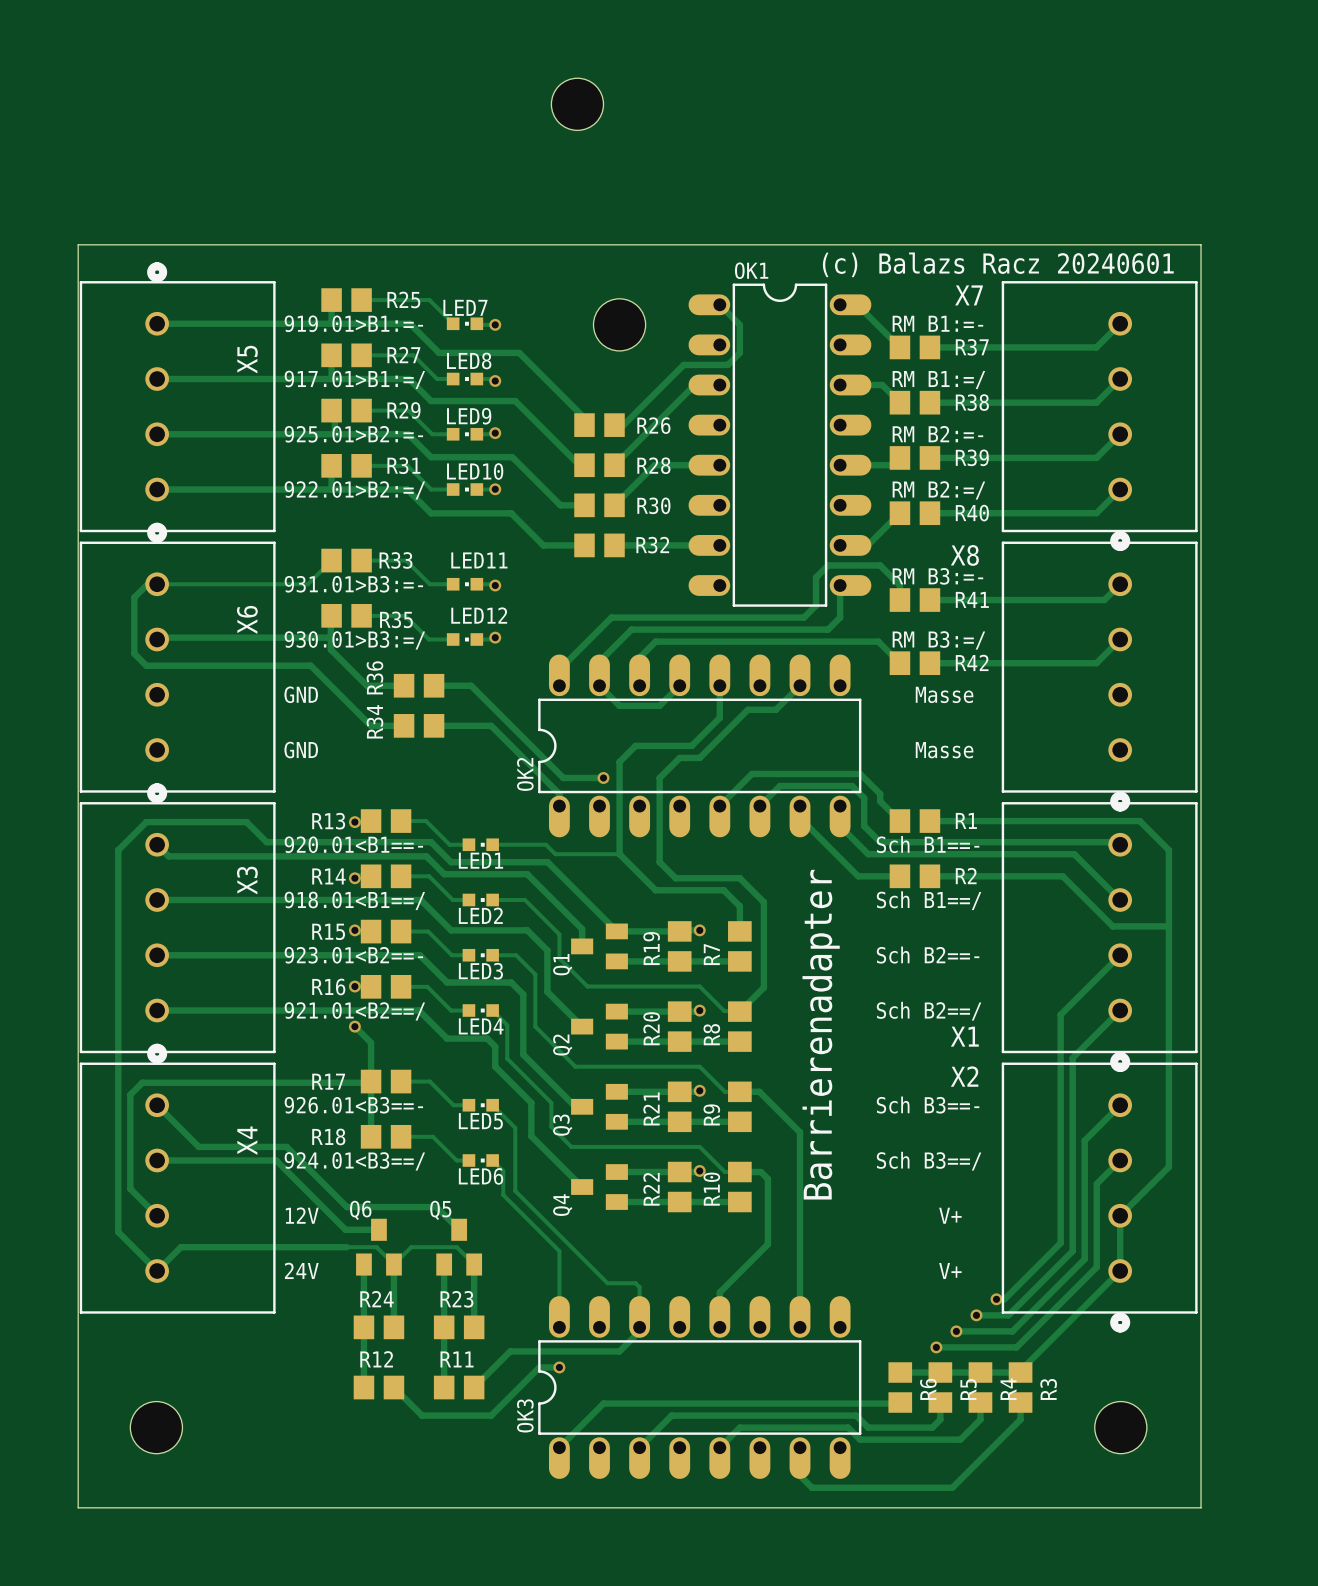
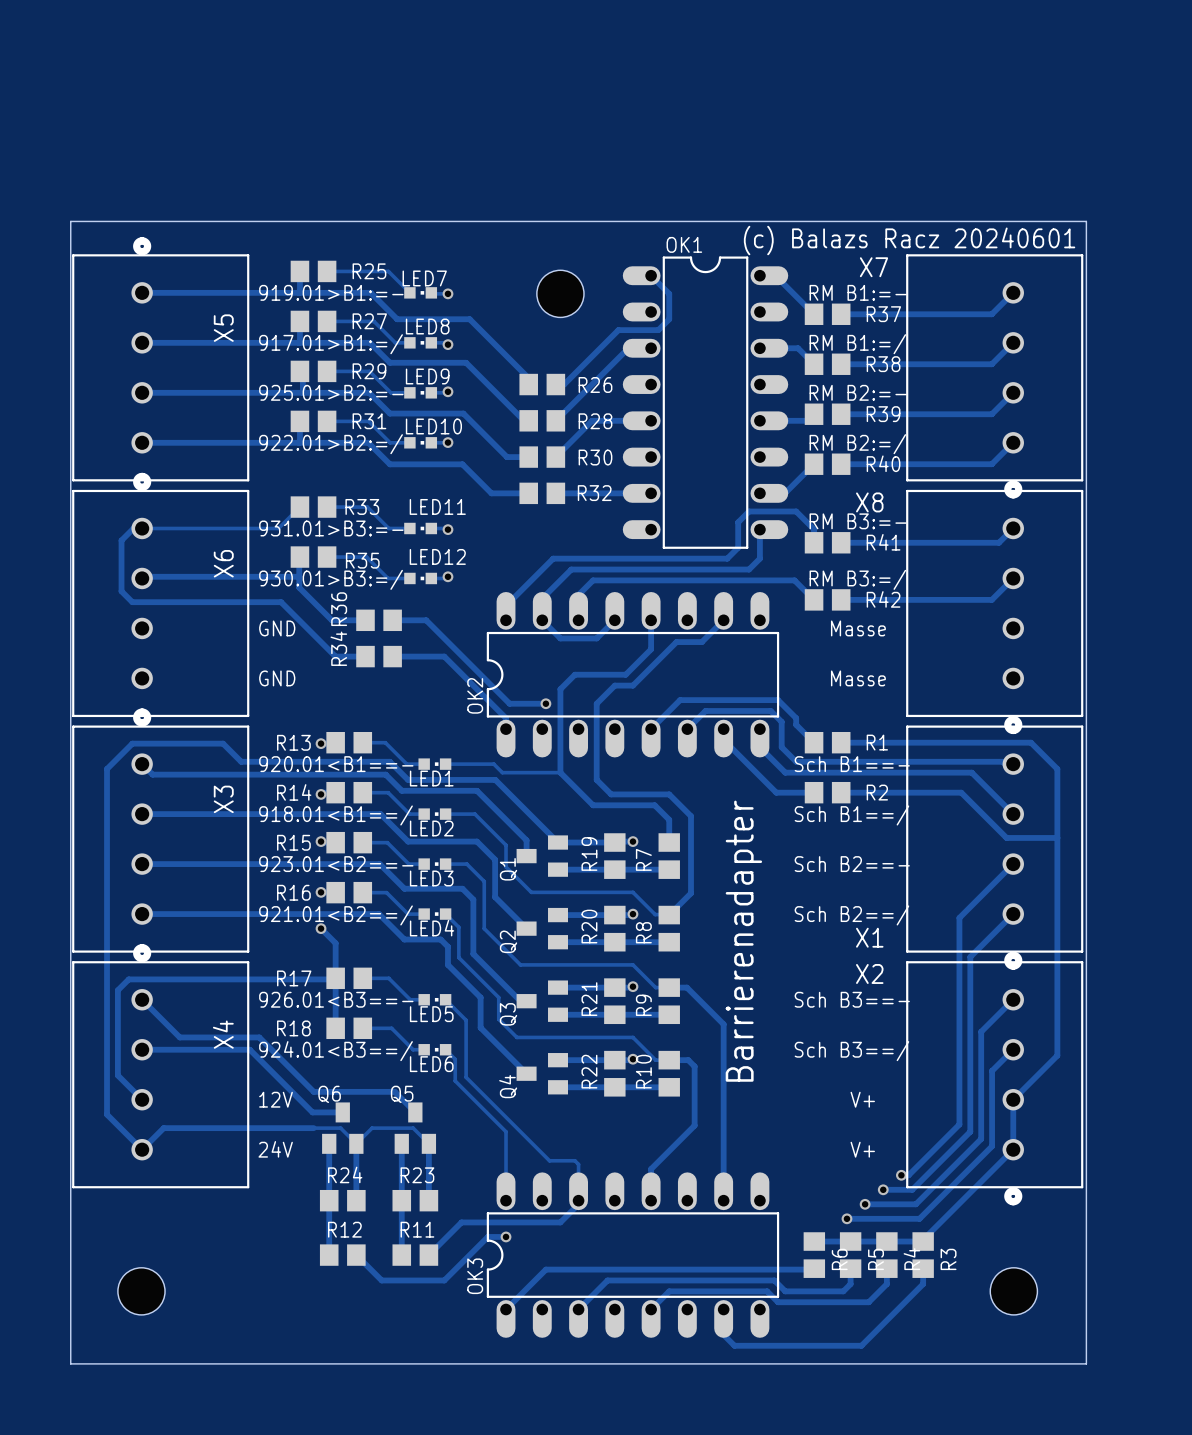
part: (577, 104) -> none

